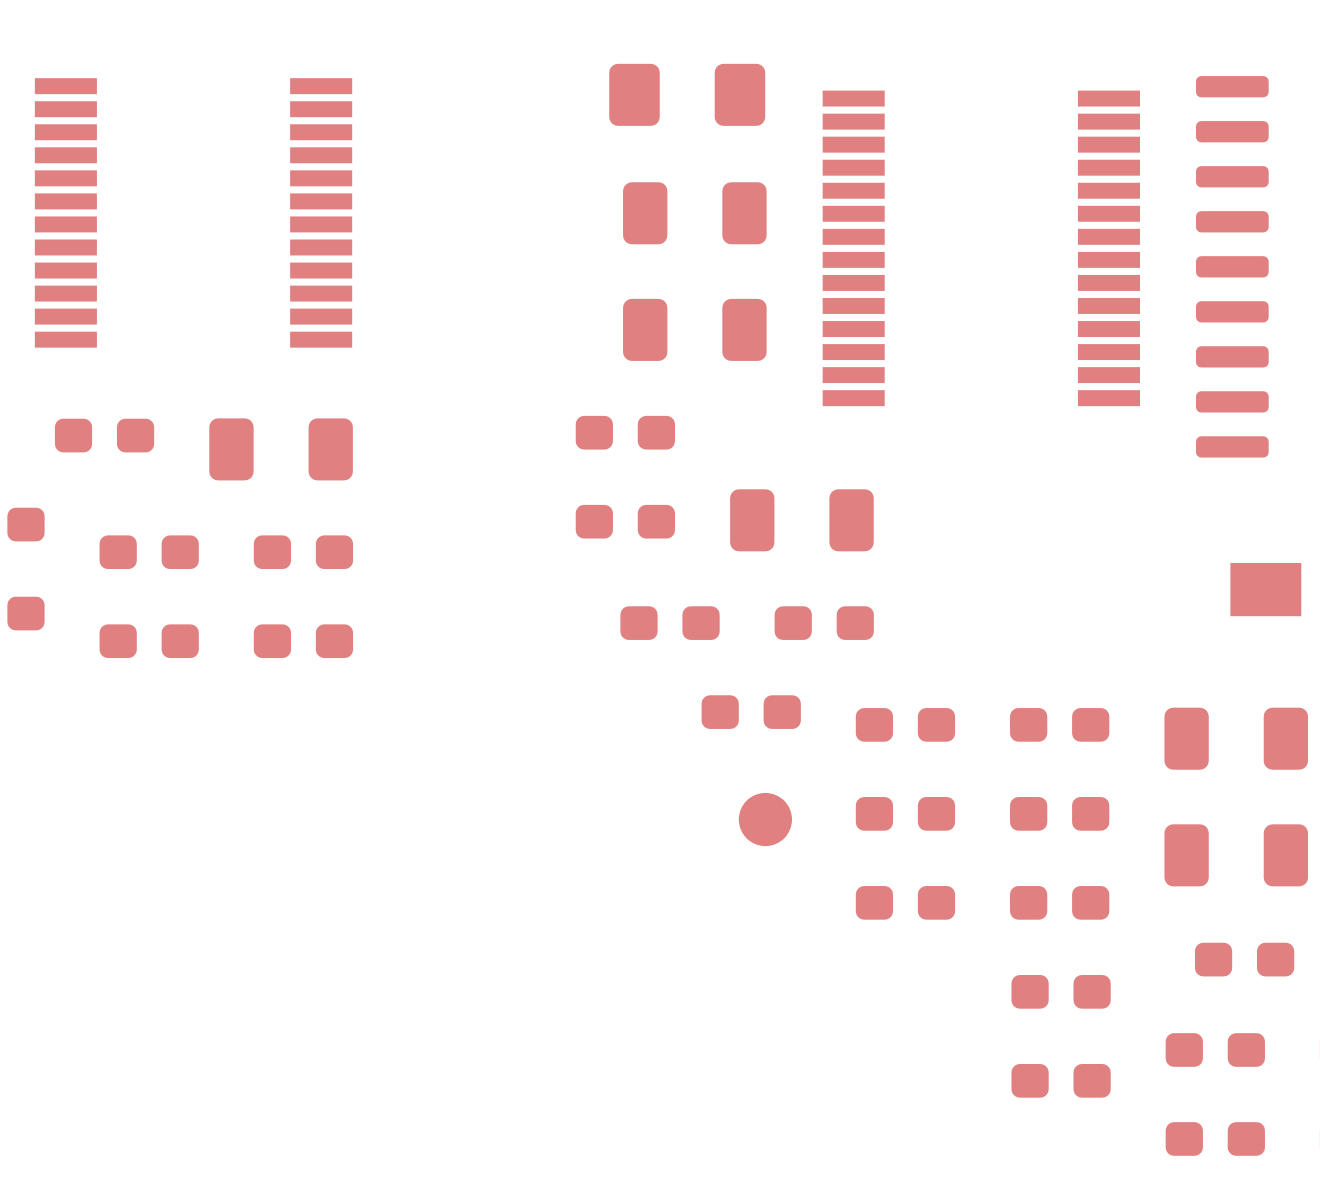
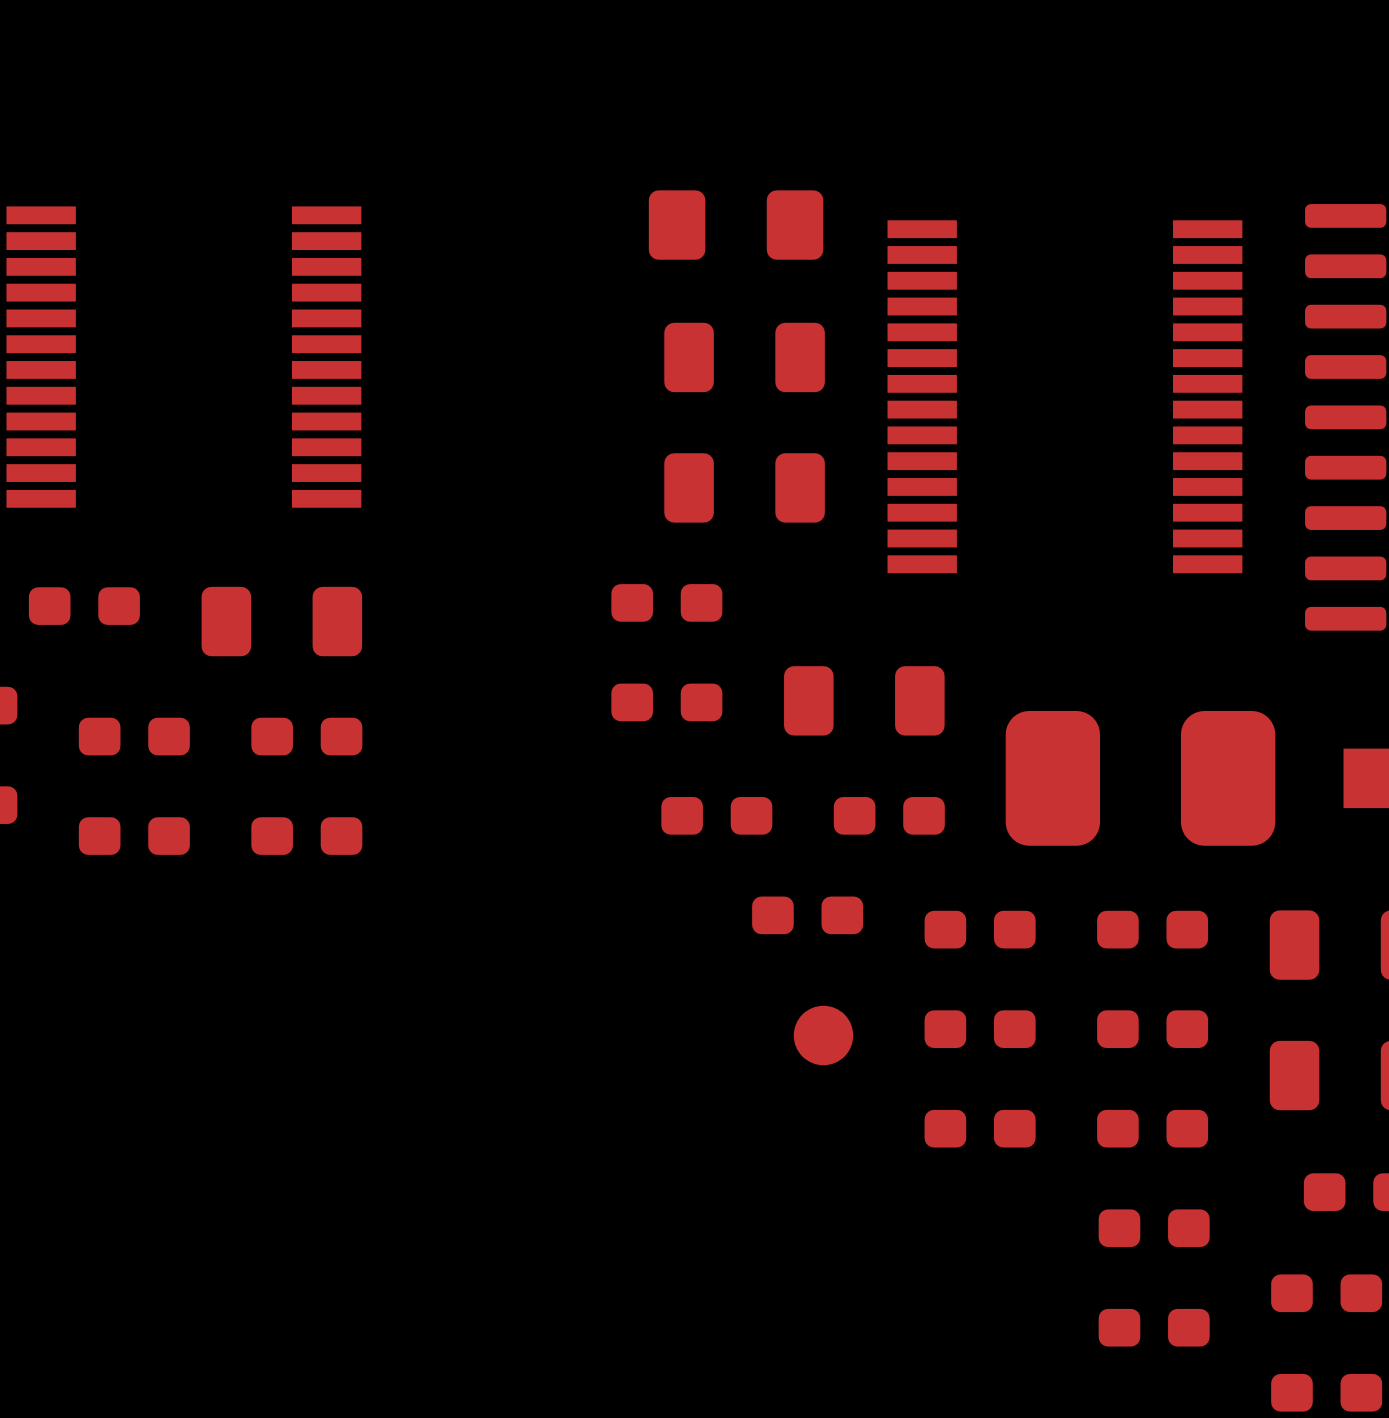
part: none -> (1140, 778)

